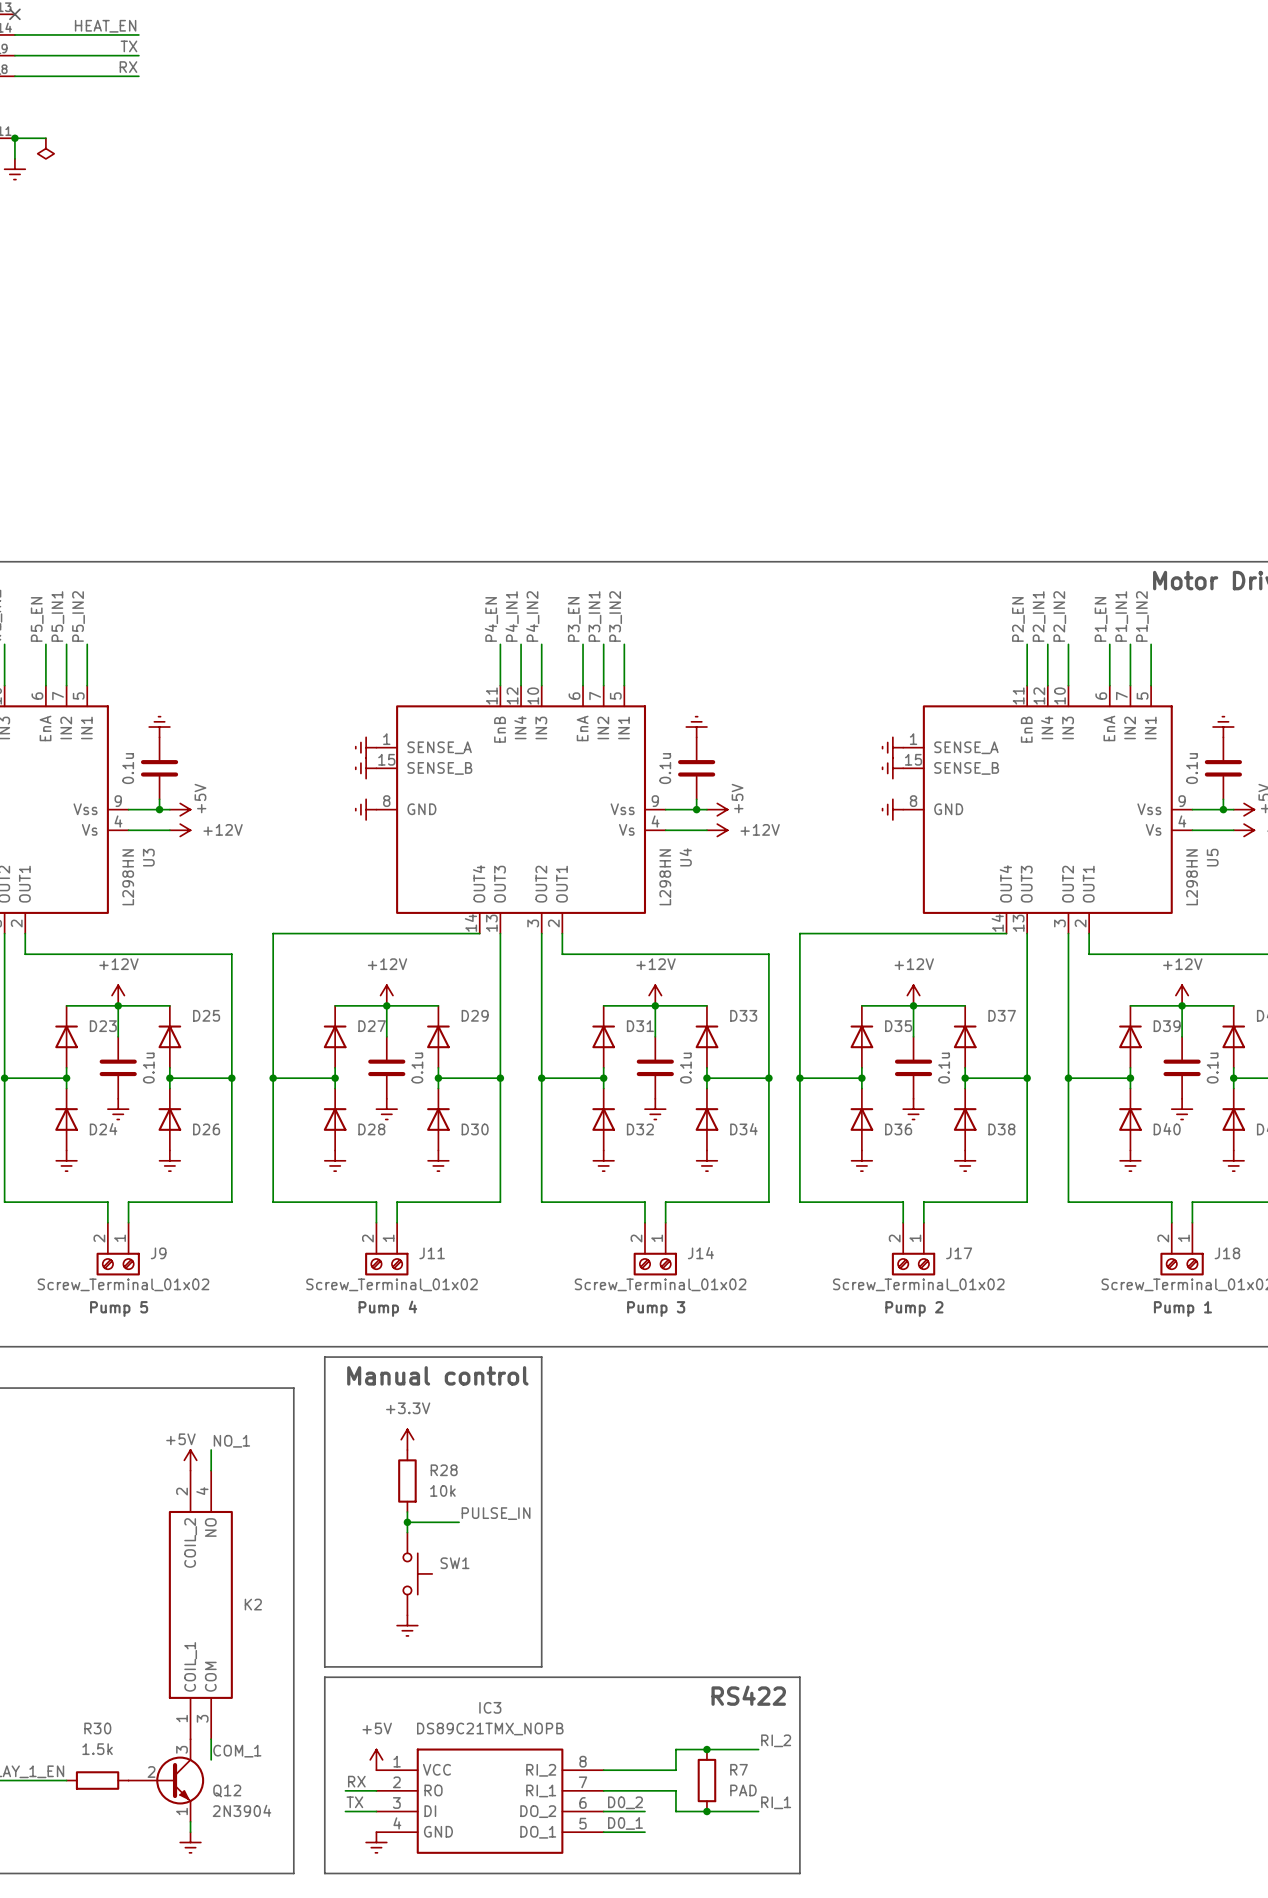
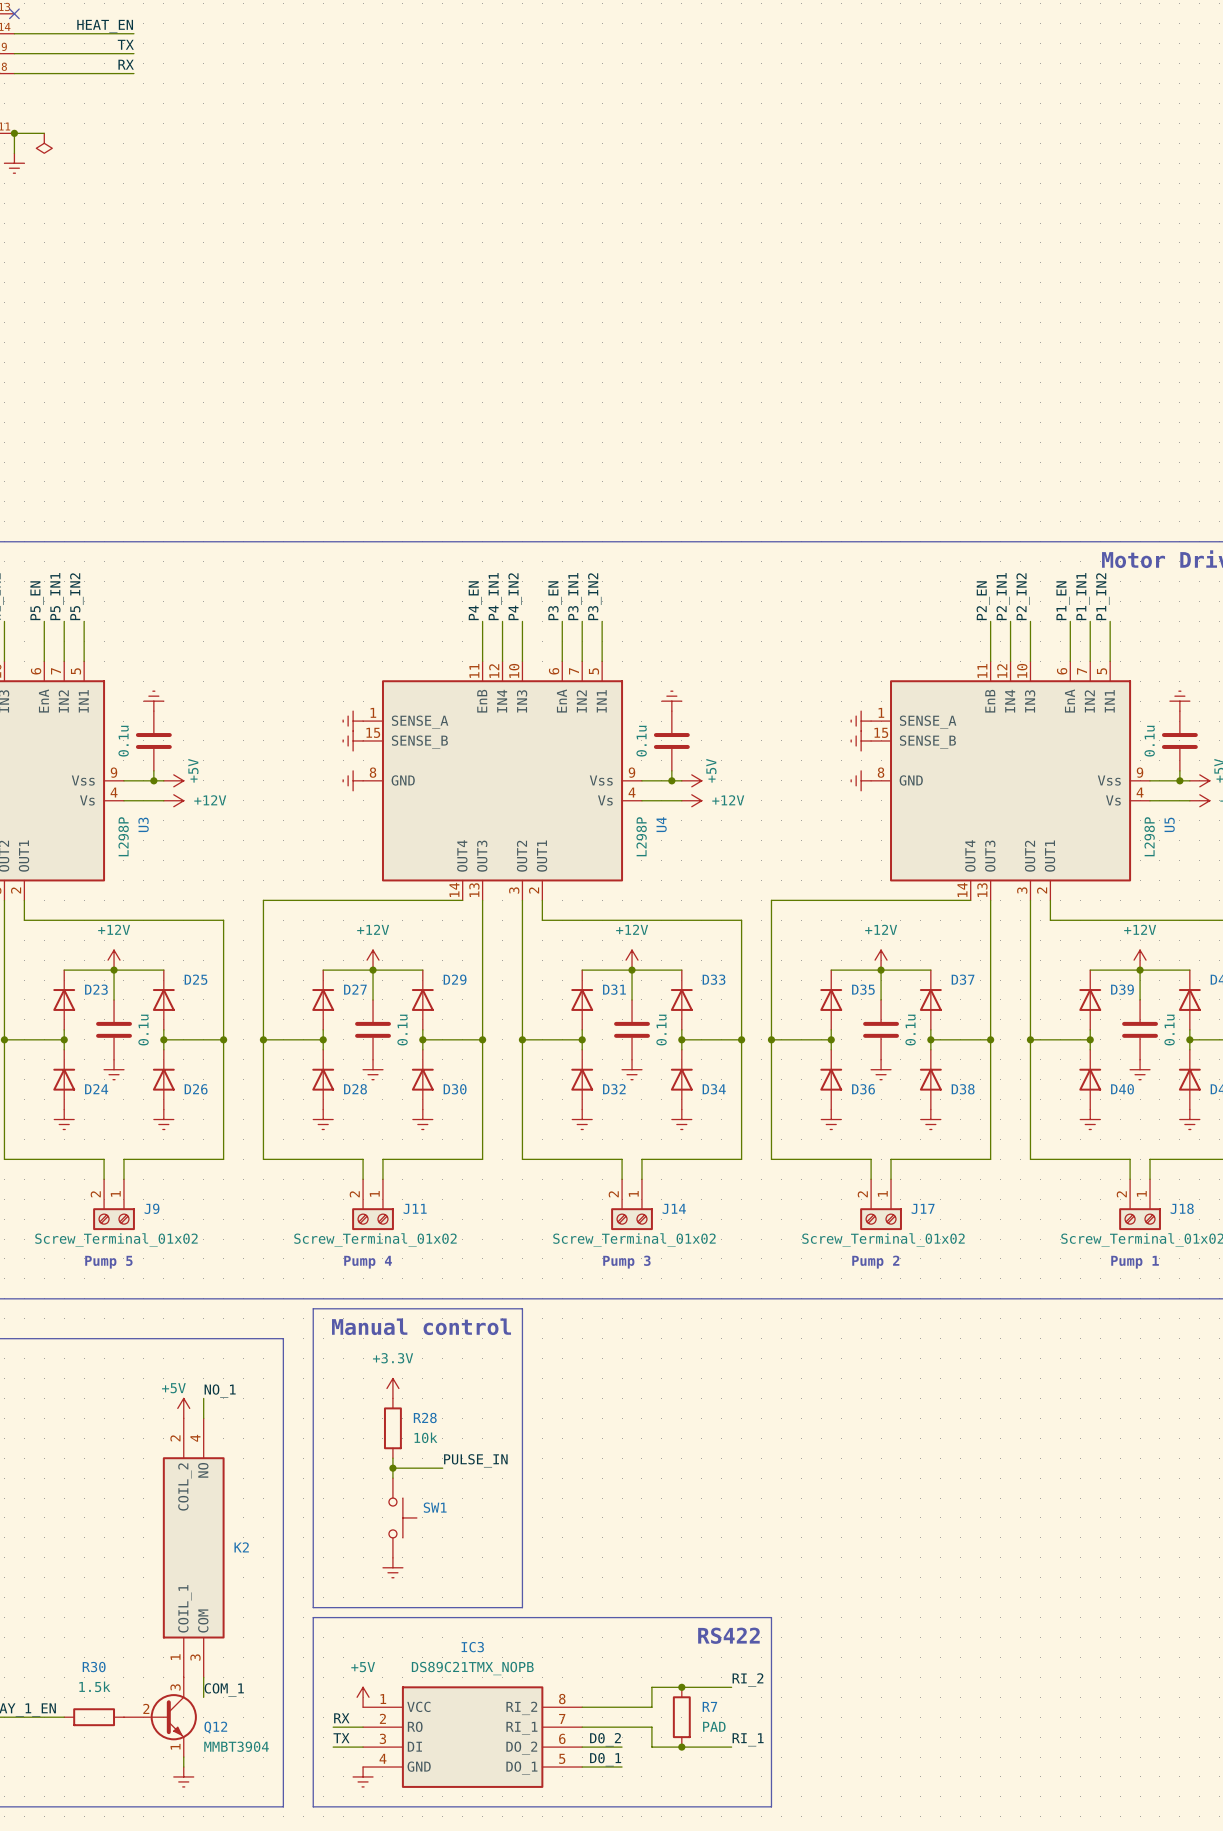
U3 value: L298HN (128, 877) -> L298P (123, 836)
U4 value: L298HN (665, 877) -> L298P (641, 836)
U5 value: L298HN (1192, 877) -> L298P (1149, 836)
Q12 value: 2N3904 (242, 1810) -> MMBT3904 (236, 1746)

